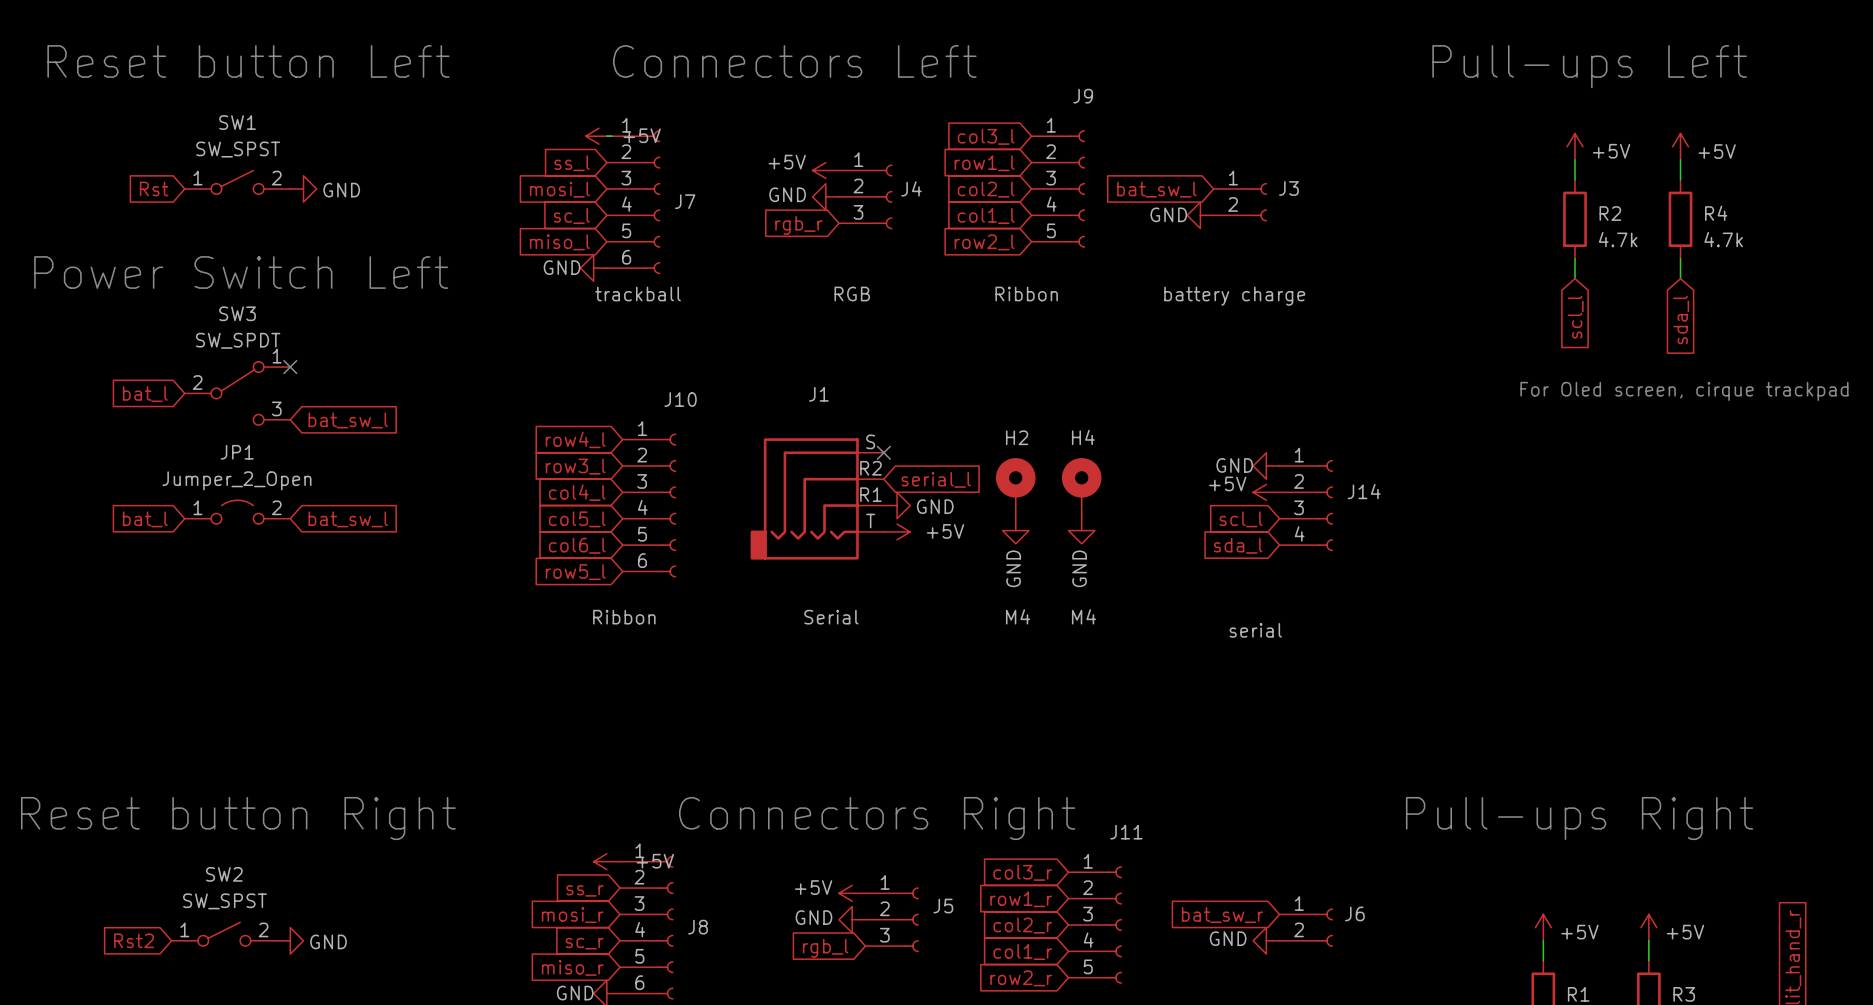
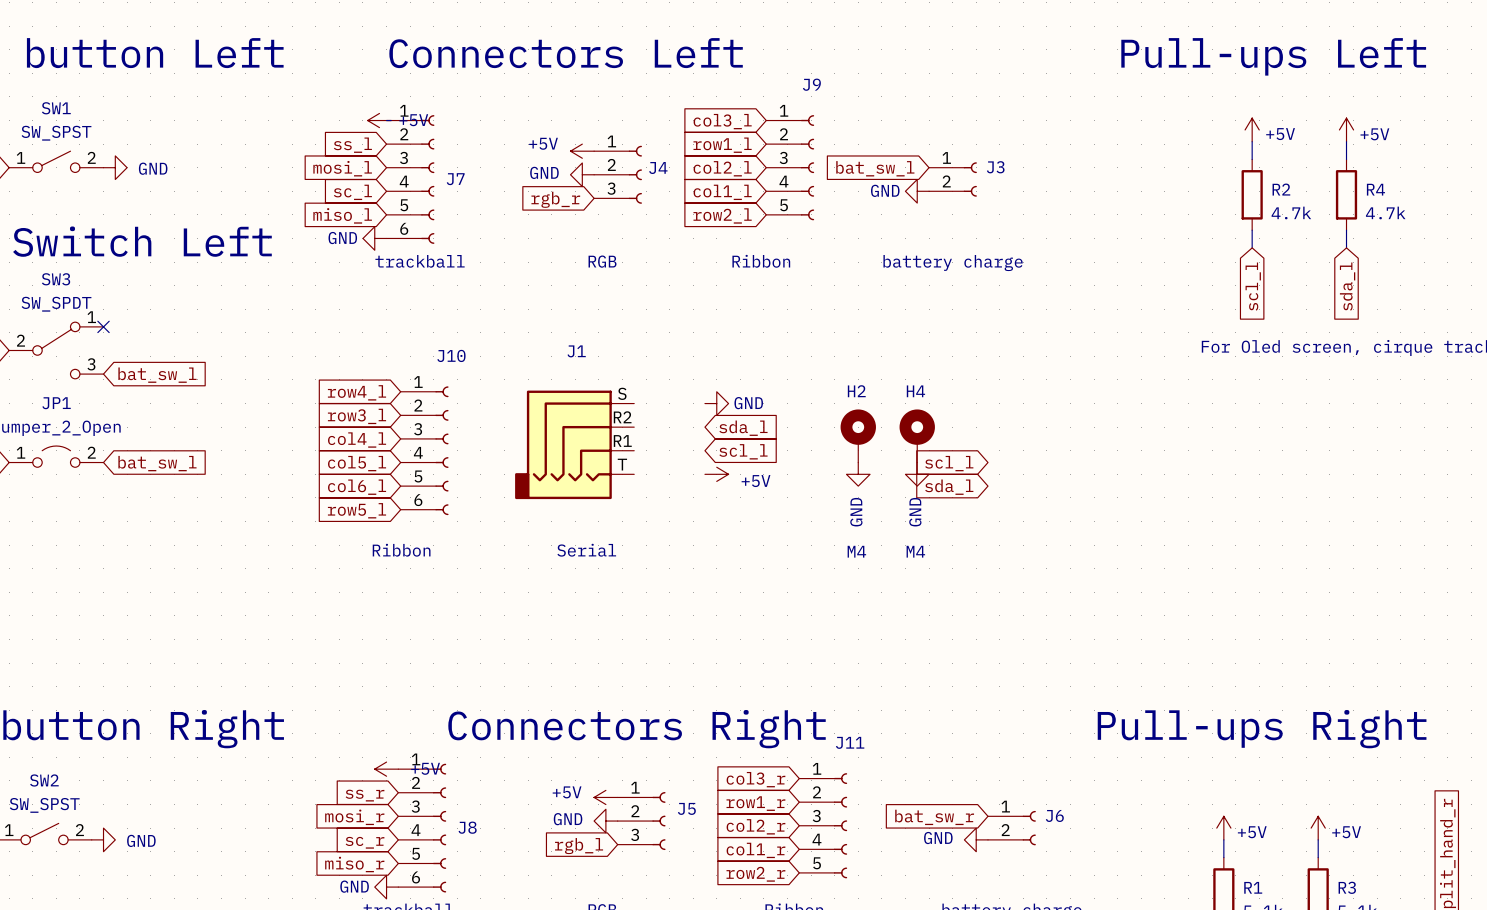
no-connect mark: (883, 452) -> none
power symbol: none -> GND (716, 403)
power symbol: GND (1266, 465) -> none
global label: serial_l (936, 479) -> none
global label: none -> sda_l (743, 428)
H2 position: (1015, 487) -> (858, 435)
H4 position: (1081, 487) -> (917, 435)
power symbol: +5V (1266, 492) -> none
power symbol: GND (897, 505) -> none
J14: serial (1306, 505) -> none
global label: none -> scl_l (743, 451)
power symbol: GND (1015, 530) -> none
power symbol position: GND (1081, 530) -> GND (858, 474)
power symbol position: +5V (897, 531) -> +5V (716, 474)
power symbol text position: +5V (945, 531) -> +5V (756, 481)
power symbol: none -> GND (917, 474)

